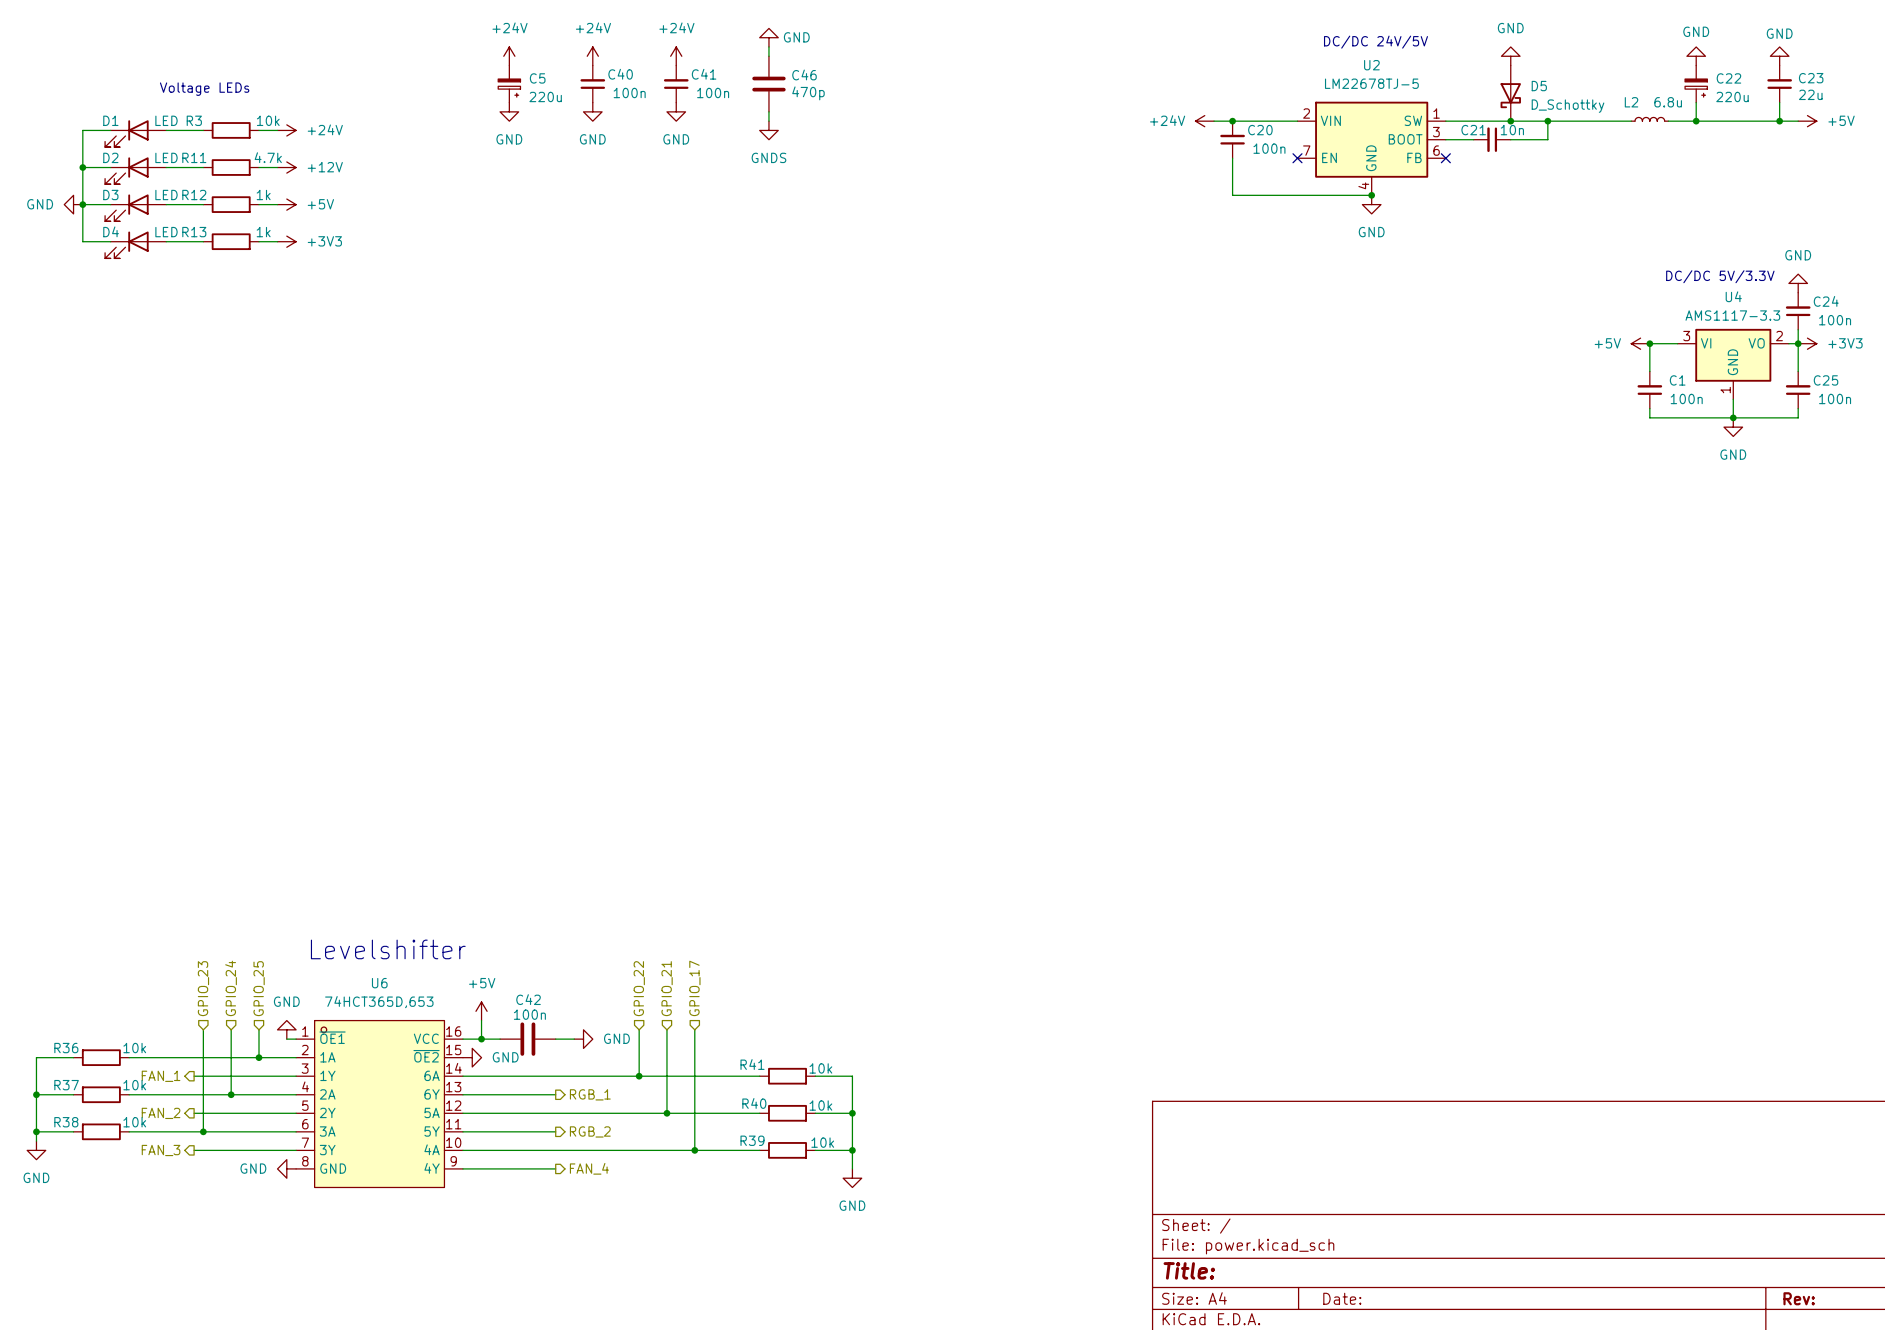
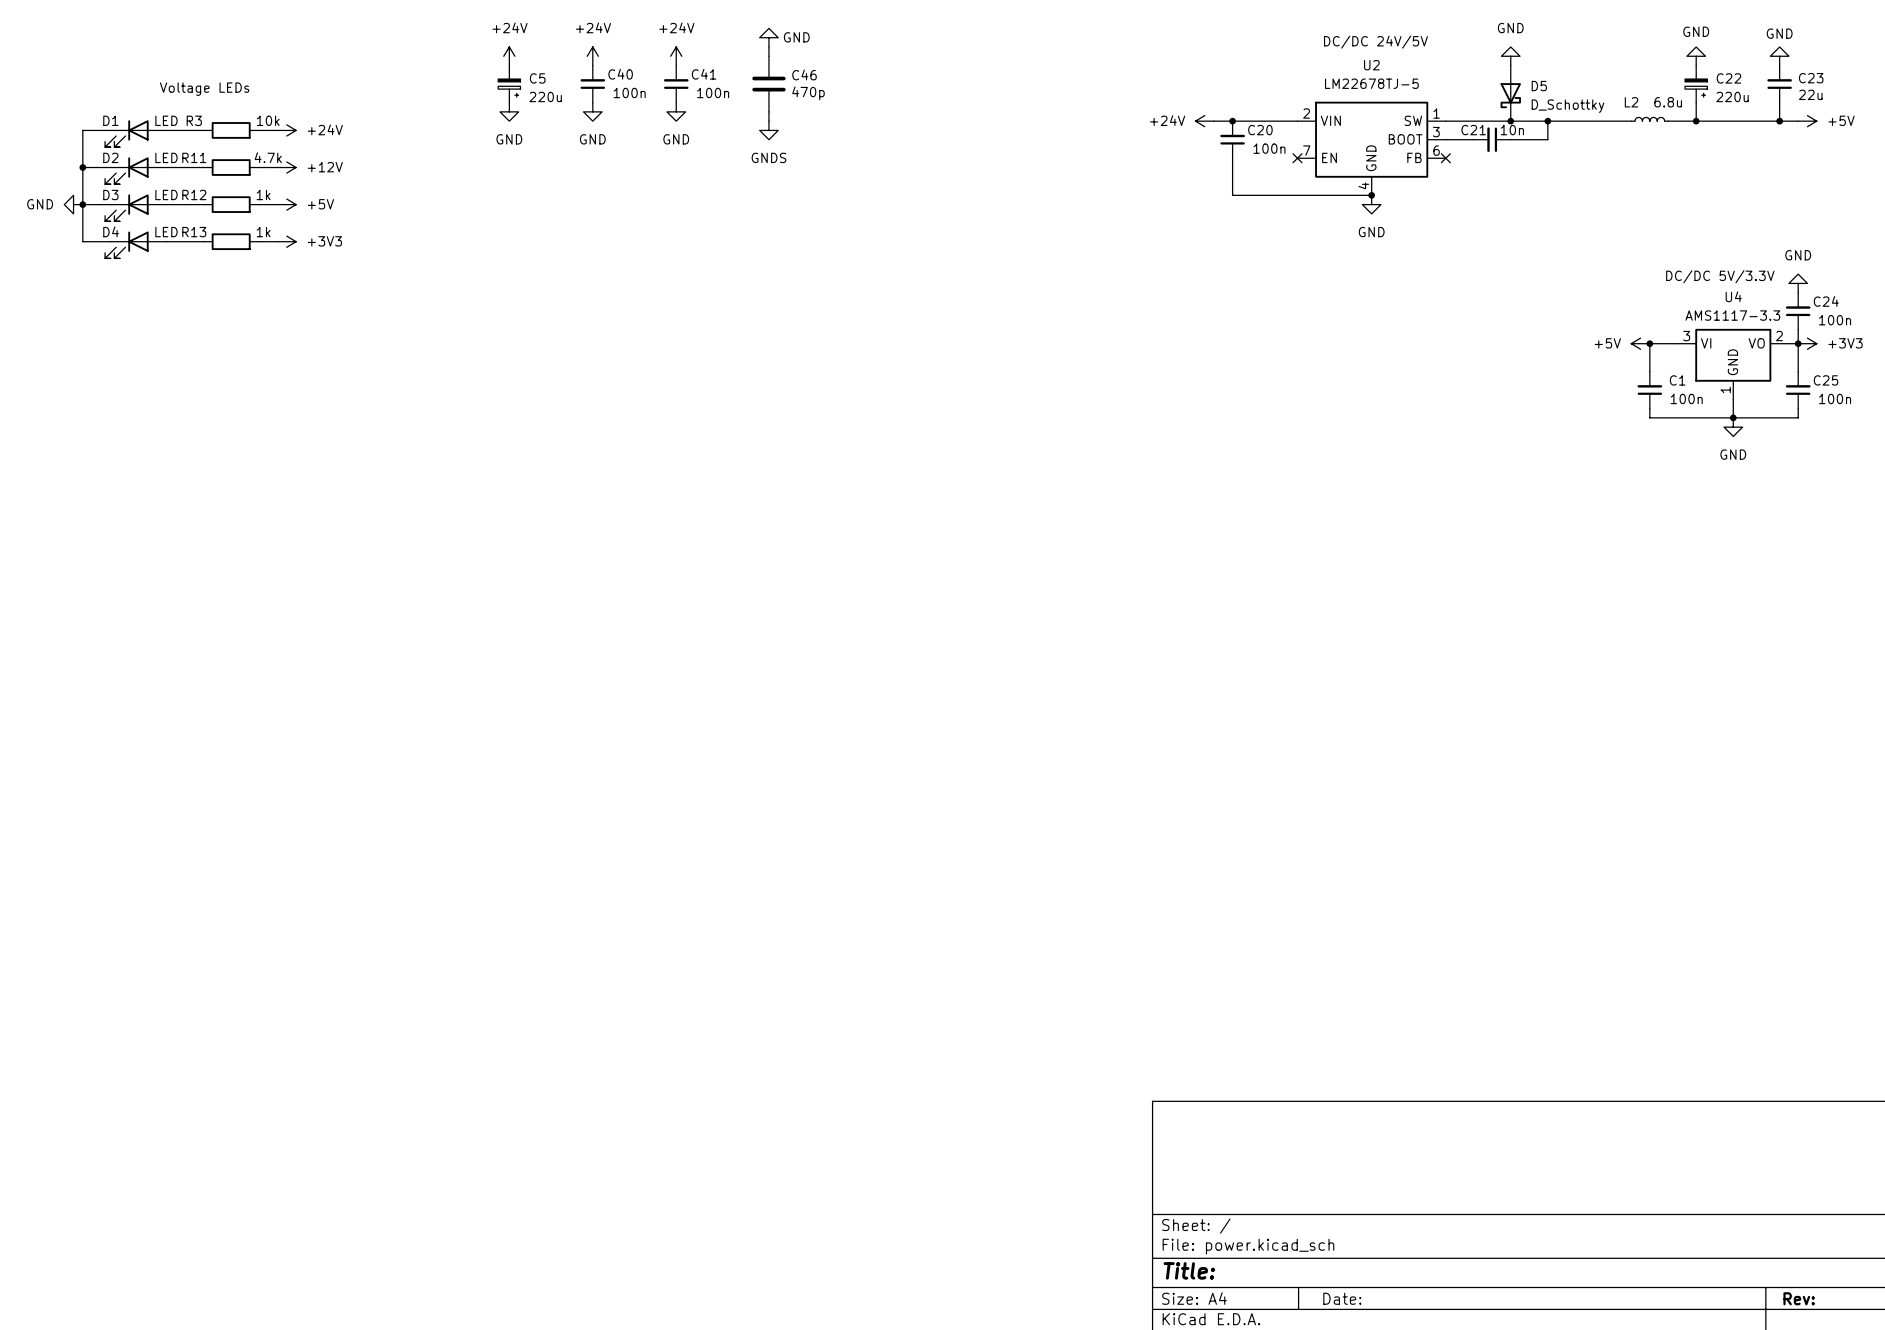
text: Levelshifter (388, 949) -> none
hierarchical label: GPIO_23 (203, 988) -> none
hierarchical label: GPIO_24 (231, 988) -> none
hierarchical label: GPIO_25 (259, 988) -> none
hierarchical label: GPIO_22 (639, 988) -> none
hierarchical label: GPIO_21 (667, 988) -> none
hierarchical label: GPIO_17 (694, 988) -> none
power symbol: +5V (481, 1011) -> none
wire: (481, 1020) (481, 1039) -> none
wire: (203, 1029) (203, 1131) -> none
wire: (231, 1029) (231, 1094) -> none
wire: (258, 1029) (258, 1057) -> none
power symbol: GND (286, 1029) -> none
wire: (639, 1029) (639, 1076) -> none
wire: (666, 1029) (666, 1113) -> none
wire: (694, 1029) (694, 1150) -> none
wire: (286, 1039) (296, 1039) -> none
wire: (462, 1039) (500, 1039) -> none
junction: (481, 1039) -> none
C42: 100n (527, 1039) -> none
wire: (555, 1039) (574, 1039) -> none
power symbol: GND (583, 1039) -> none
wire: (73, 1057) (36, 1057) (36, 1141) -> none
R36: 10k (101, 1057) -> none
wire: (129, 1057) (296, 1057) -> none
junction: (258, 1057) -> none
power symbol: GND (472, 1057) -> none
hierarchical label: FAN_1 (161, 1076) -> none
wire: (194, 1076) (296, 1076) -> none
wire: (462, 1076) (759, 1076) -> none
junction: (639, 1076) -> none
R41: 10k (787, 1076) -> none
wire: (815, 1076) (852, 1076) (852, 1168) -> none
wire: (36, 1094) (73, 1094) -> none
junction: (36, 1094) -> none
R37: 10k (101, 1094) -> none
wire: (129, 1094) (296, 1094) -> none
junction: (231, 1094) -> none
wire: (462, 1094) (555, 1094) -> none
hierarchical label: RGB_1 (590, 1094) -> none
U6: 74HCT365D,653 (379, 1104) -> none
hierarchical label: FAN_2 (161, 1113) -> none
wire: (194, 1113) (296, 1113) -> none
wire: (462, 1113) (759, 1113) -> none
junction: (666, 1113) -> none
R40: 10k (787, 1113) -> none
wire: (815, 1113) (852, 1113) -> none
junction: (852, 1113) -> none
wire: (36, 1131) (73, 1131) -> none
junction: (36, 1131) -> none
R38: 10k (101, 1131) -> none
wire: (129, 1131) (296, 1131) -> none
junction: (203, 1131) -> none
wire: (462, 1131) (555, 1131) -> none
hierarchical label: RGB_2 (590, 1131) -> none
power symbol: GND (36, 1150) -> none
hierarchical label: FAN_3 (161, 1150) -> none
wire: (194, 1150) (296, 1150) -> none
wire: (462, 1150) (759, 1150) -> none
junction: (694, 1150) -> none
R39: 10k (787, 1150) -> none
wire: (815, 1150) (852, 1150) -> none
junction: (852, 1150) -> none
power symbol: GND (286, 1168) -> none
wire: (462, 1168) (555, 1168) -> none
hierarchical label: FAN_4 (589, 1168) -> none
power symbol: GND (852, 1178) -> none

